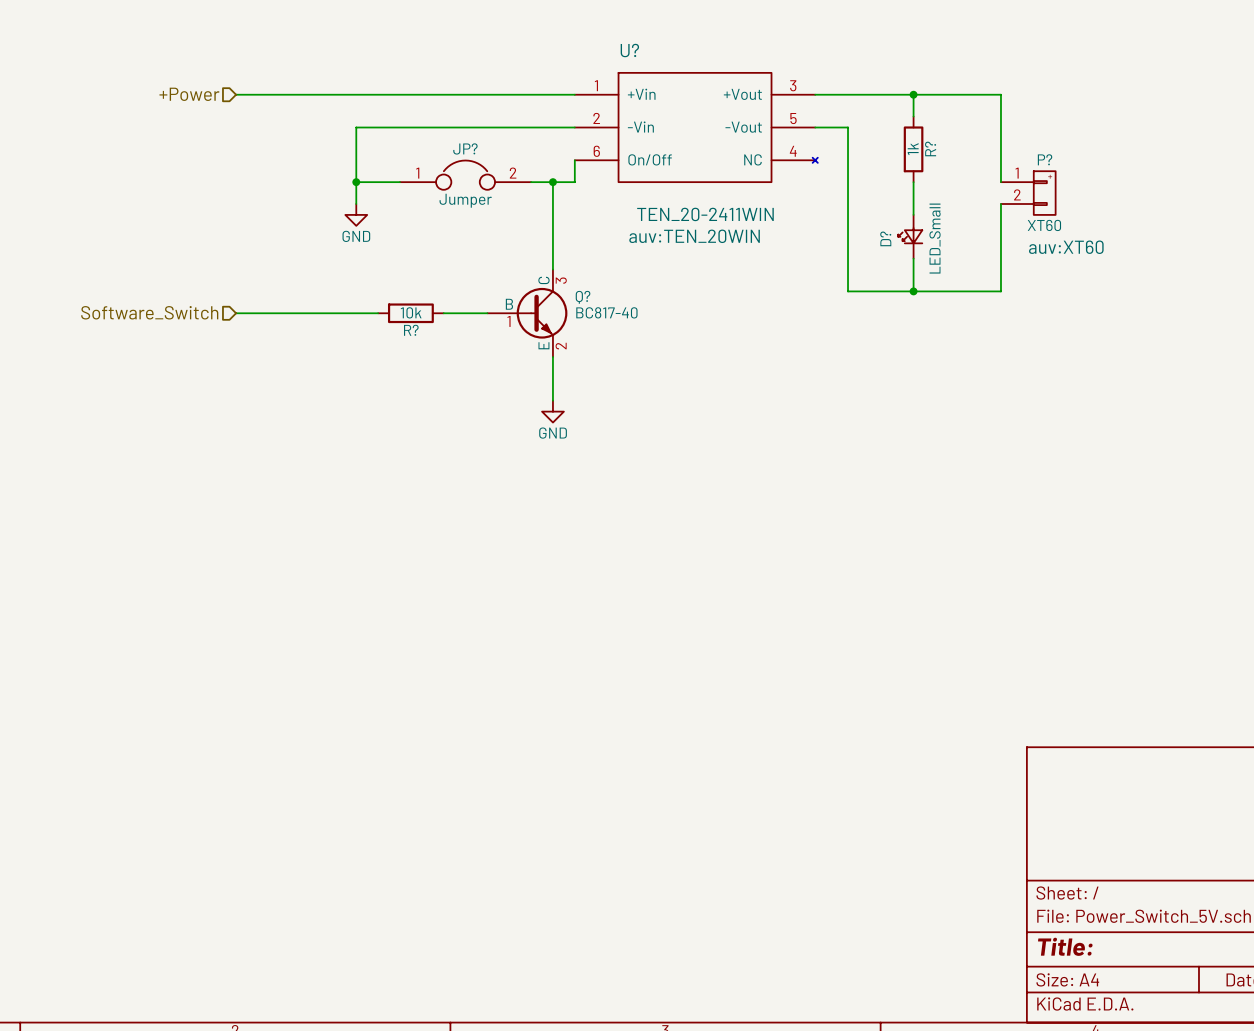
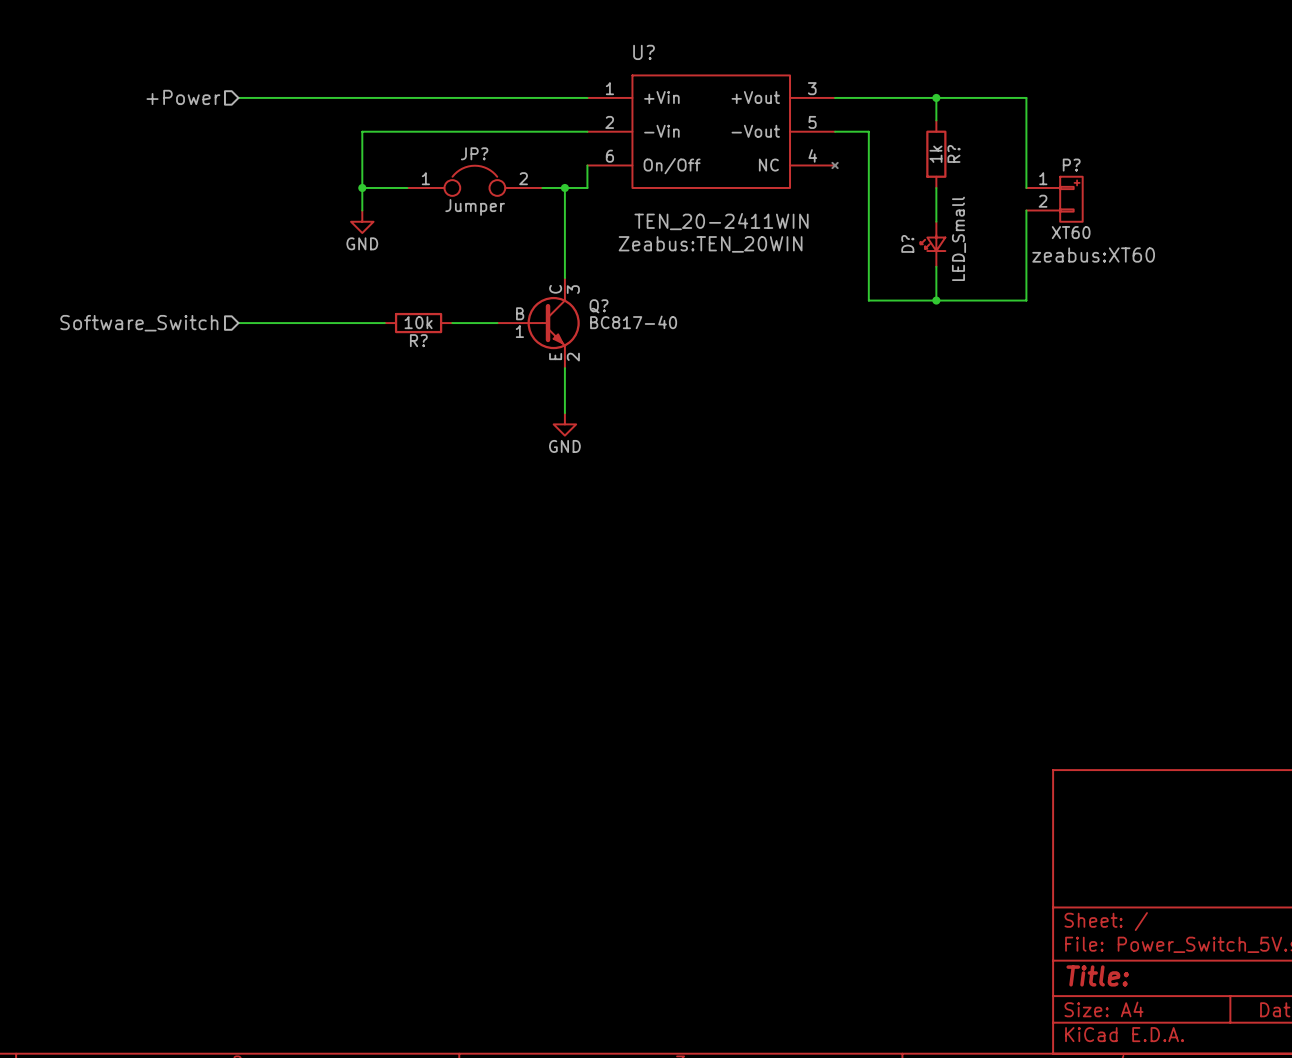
U? text: auv:TEN_20WIN (694, 236) -> Zeabus:TEN_20WIN (710, 244)
P? text: auv:XT60 (1066, 247) -> zeabus:XT60 (1093, 255)

